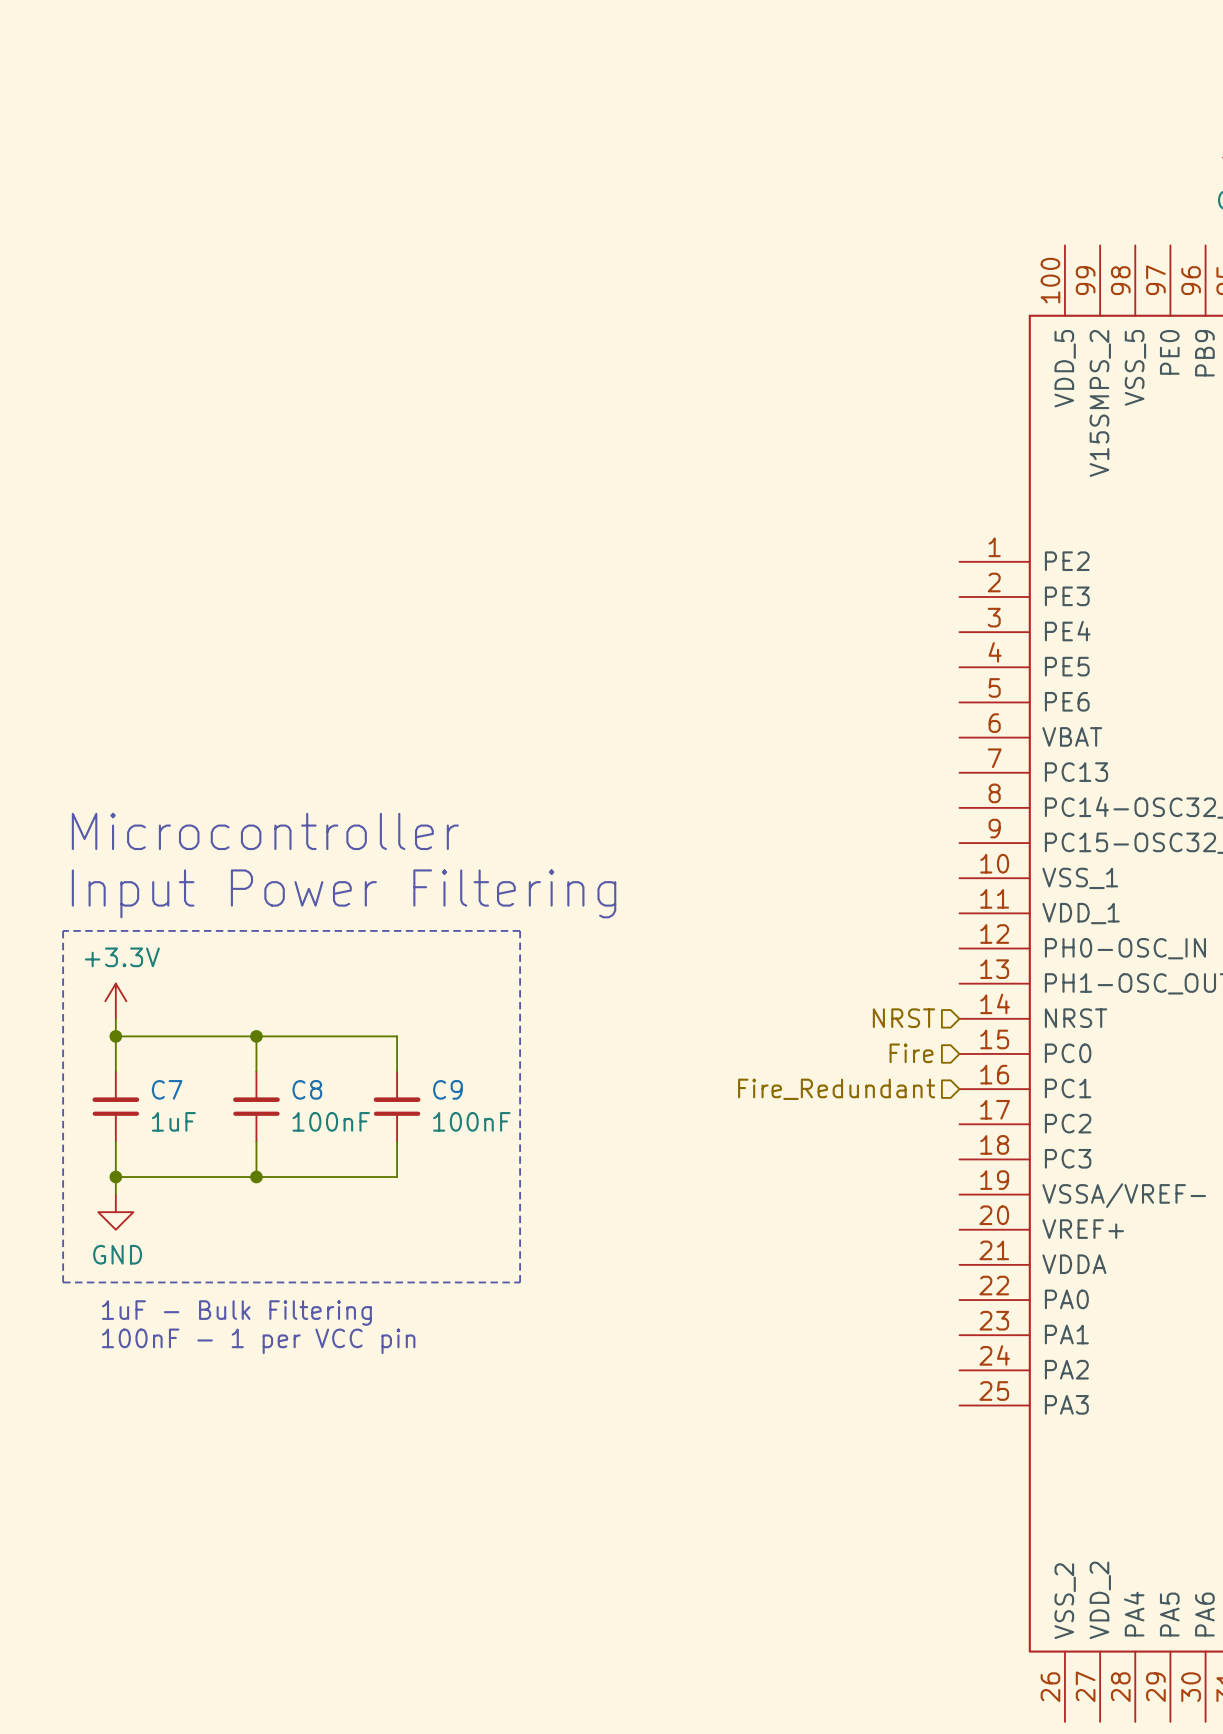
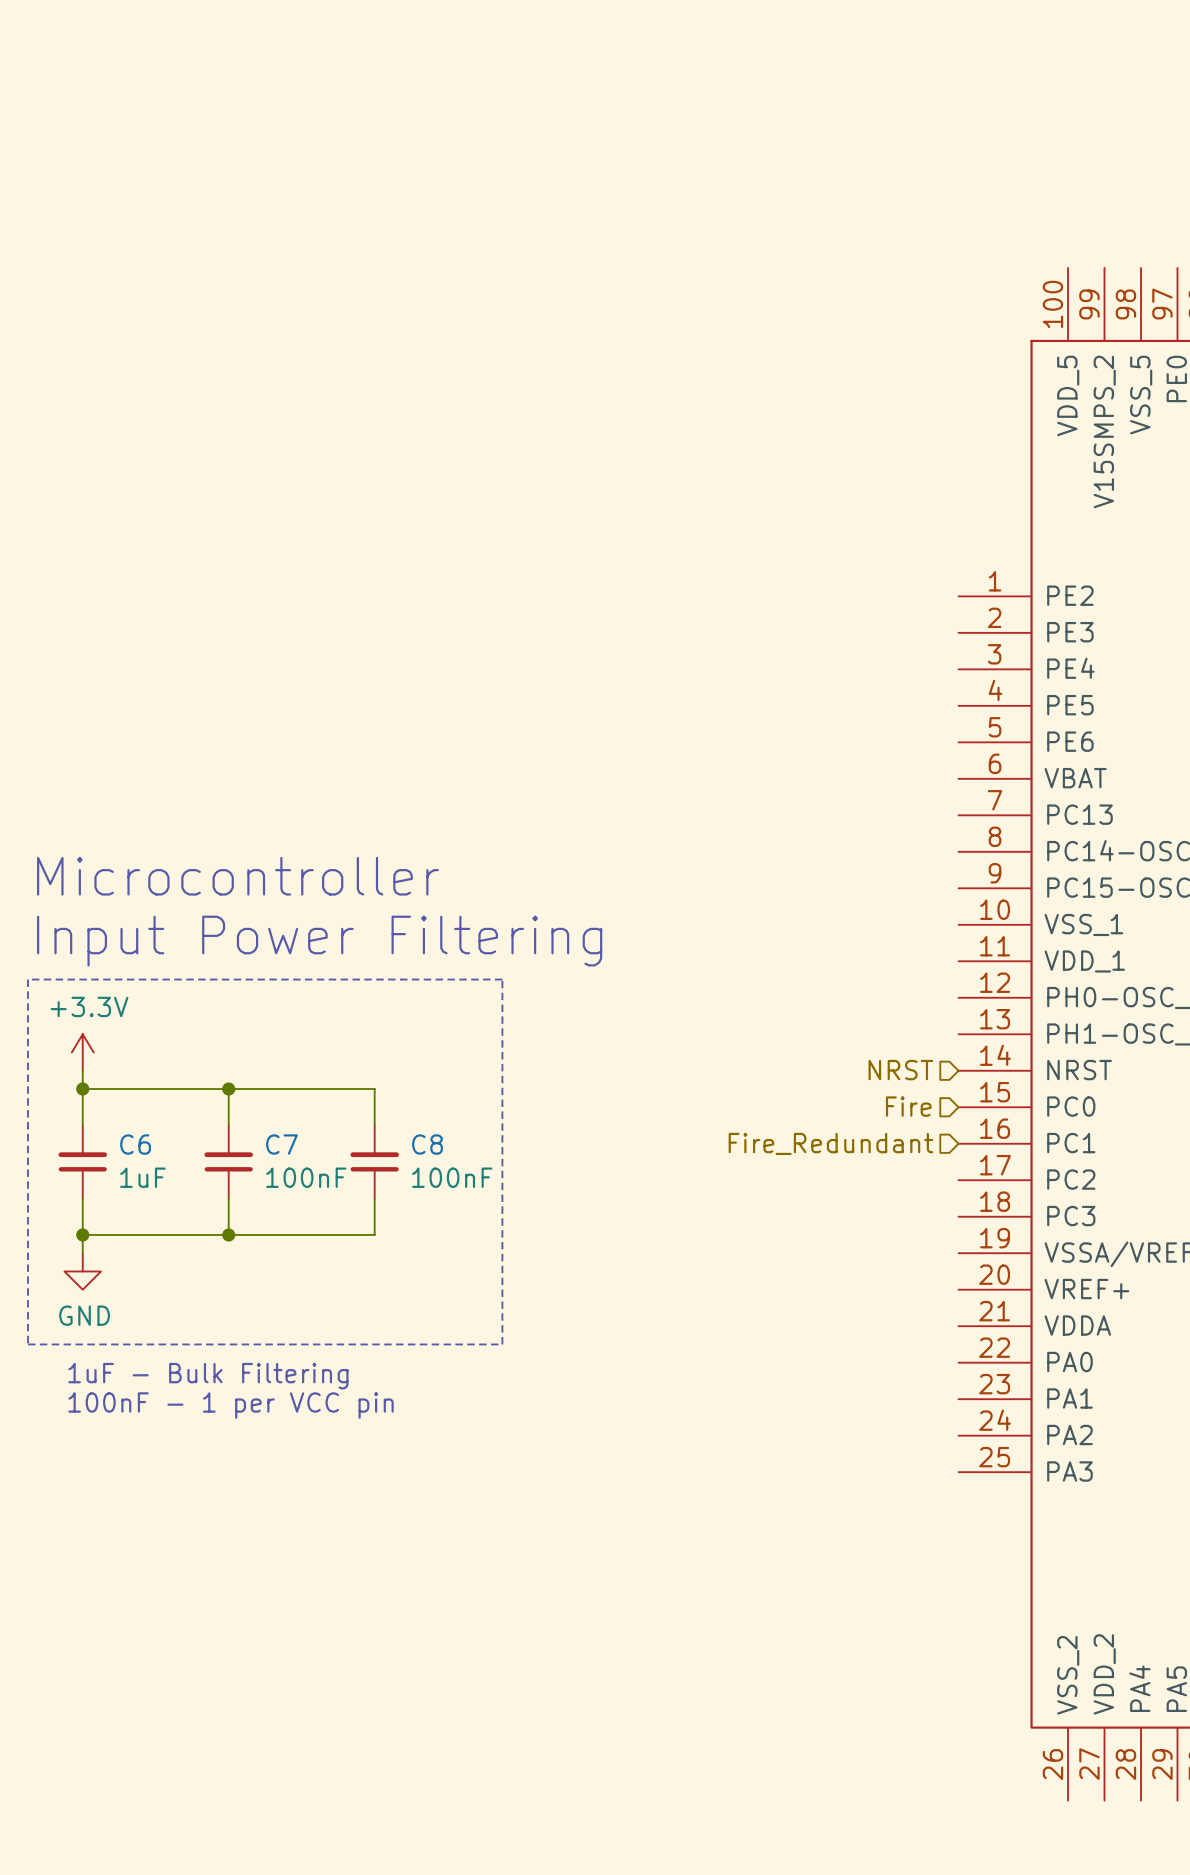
C7 name: C7 (167, 1089) -> C6 (135, 1144)
C8 name: C8 (307, 1089) -> C7 (281, 1144)
C9 name: C9 (447, 1089) -> C8 (427, 1144)

